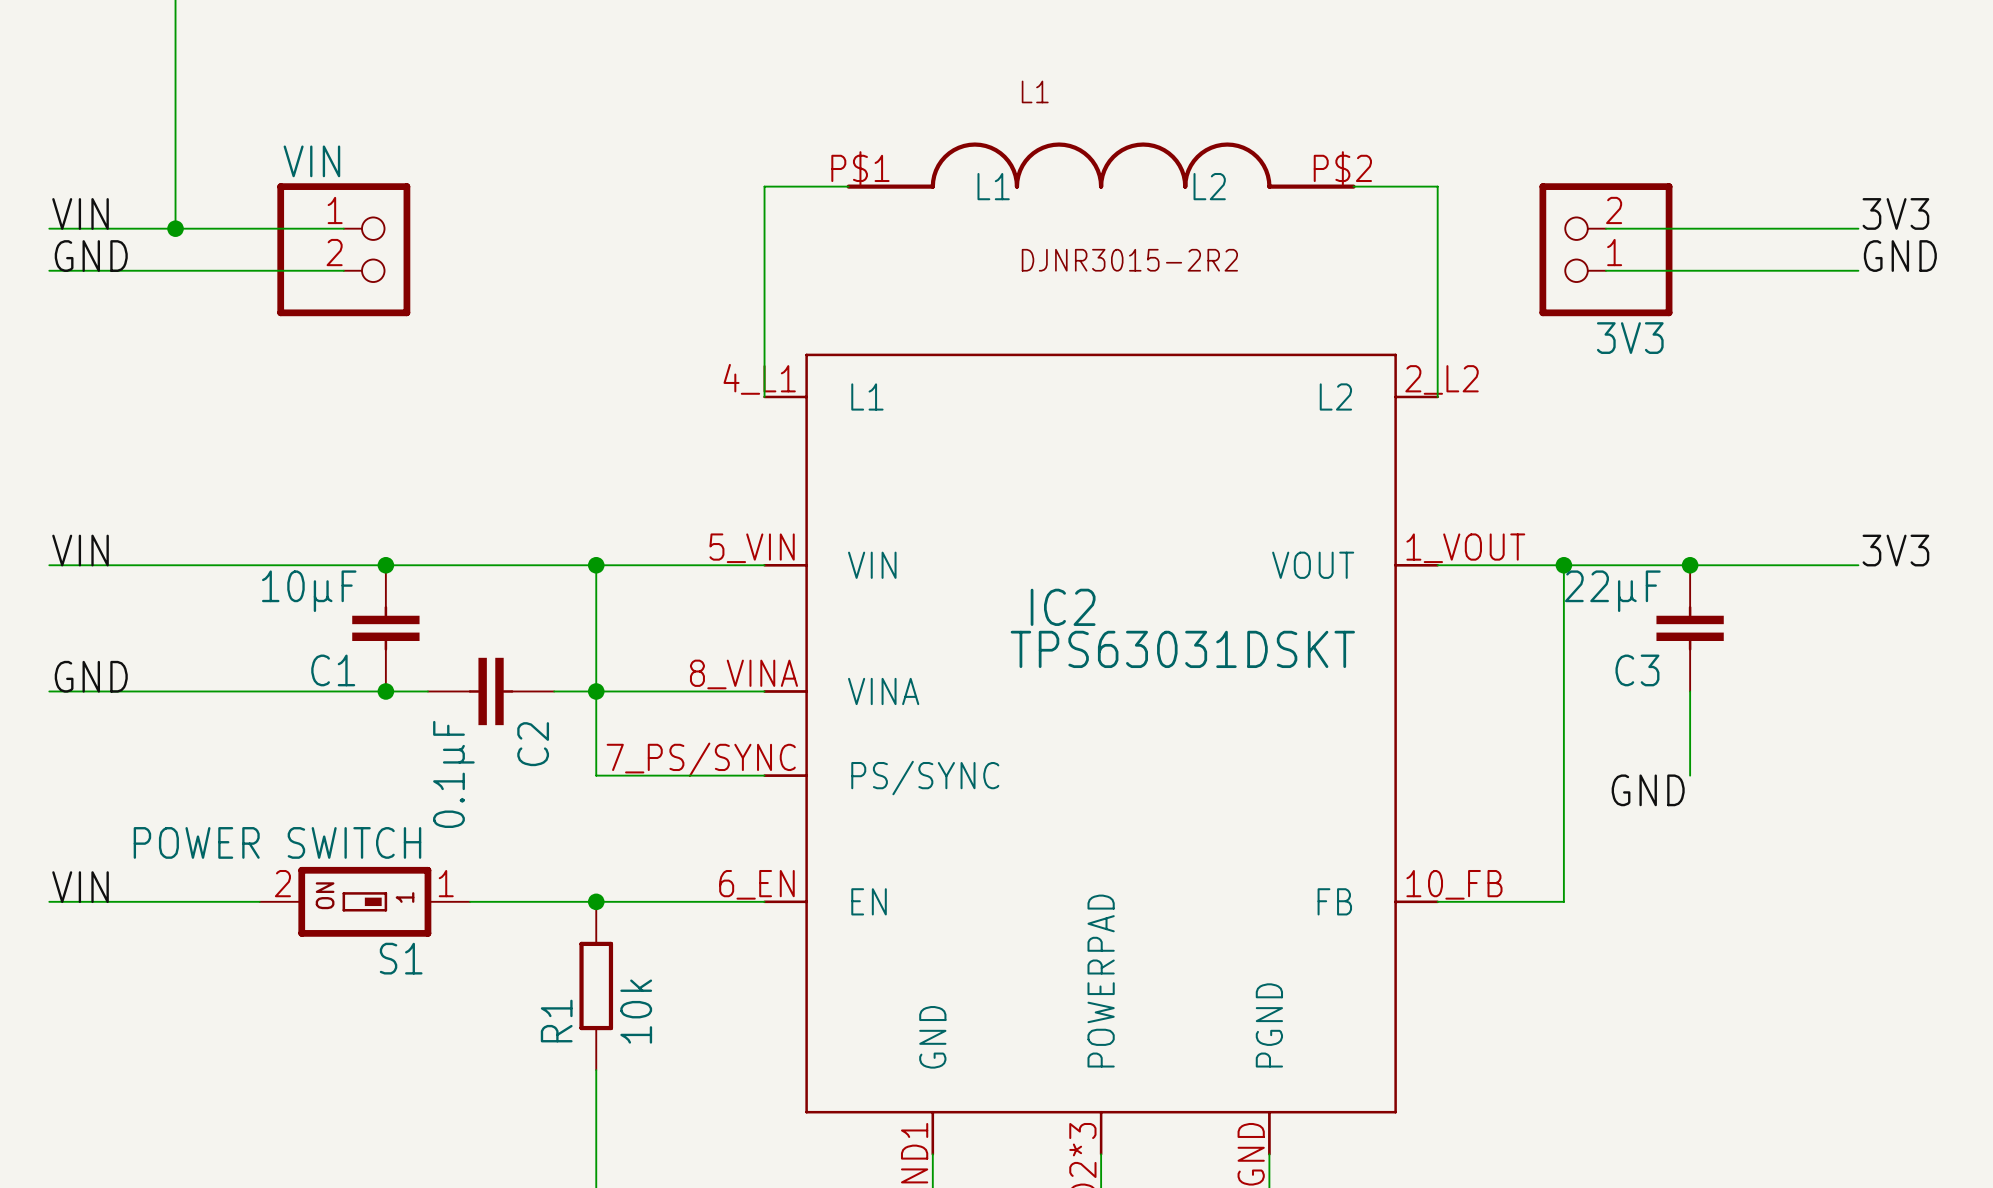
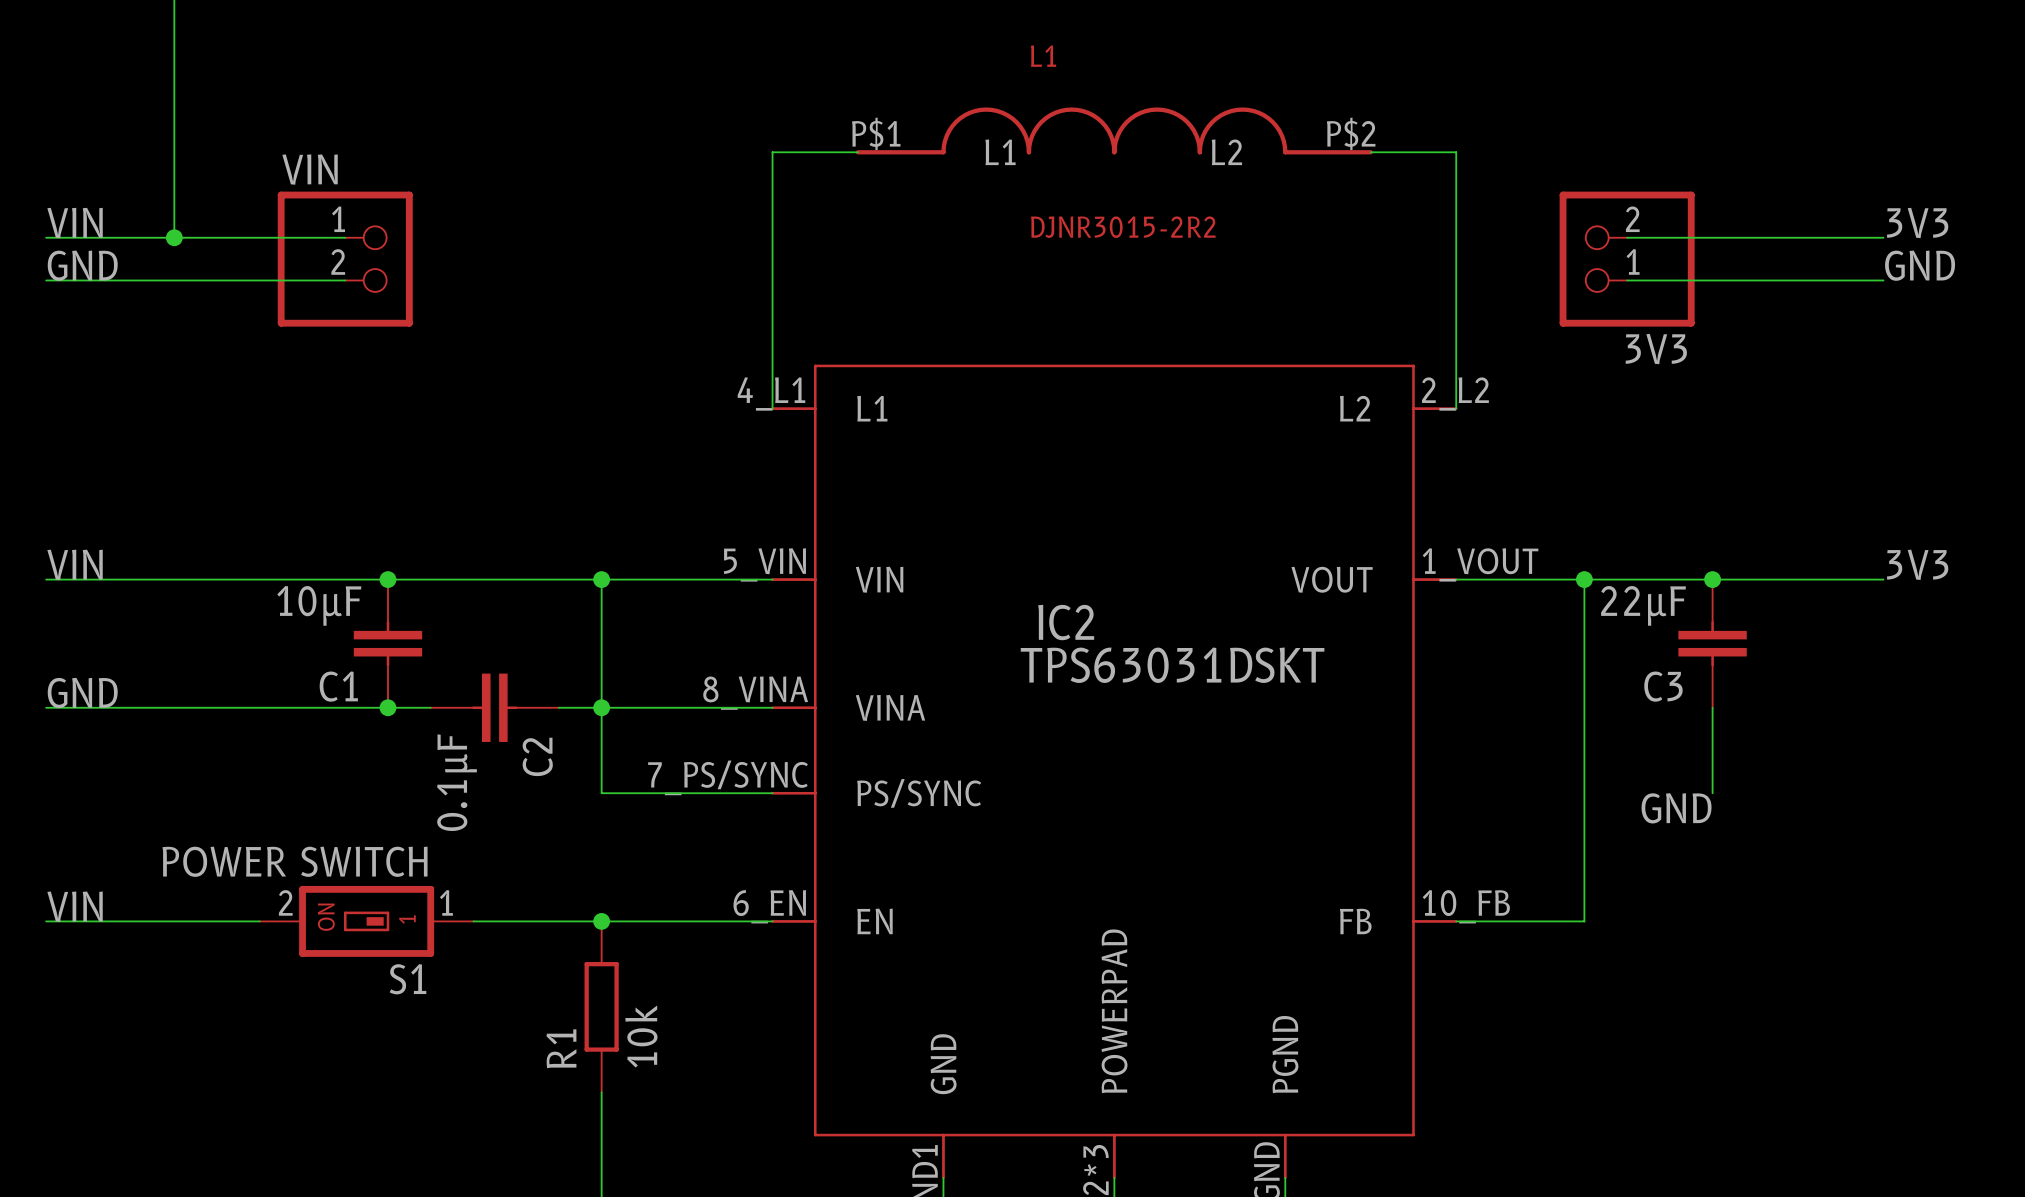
L1 position: (1101, 165) -> (1114, 130)
wire: (764, 186) (848, 186) -> (772, 195) (772, 152) (858, 152)
wire: (1353, 186) (1437, 186) -> (1370, 152) (1456, 152) (1456, 195)

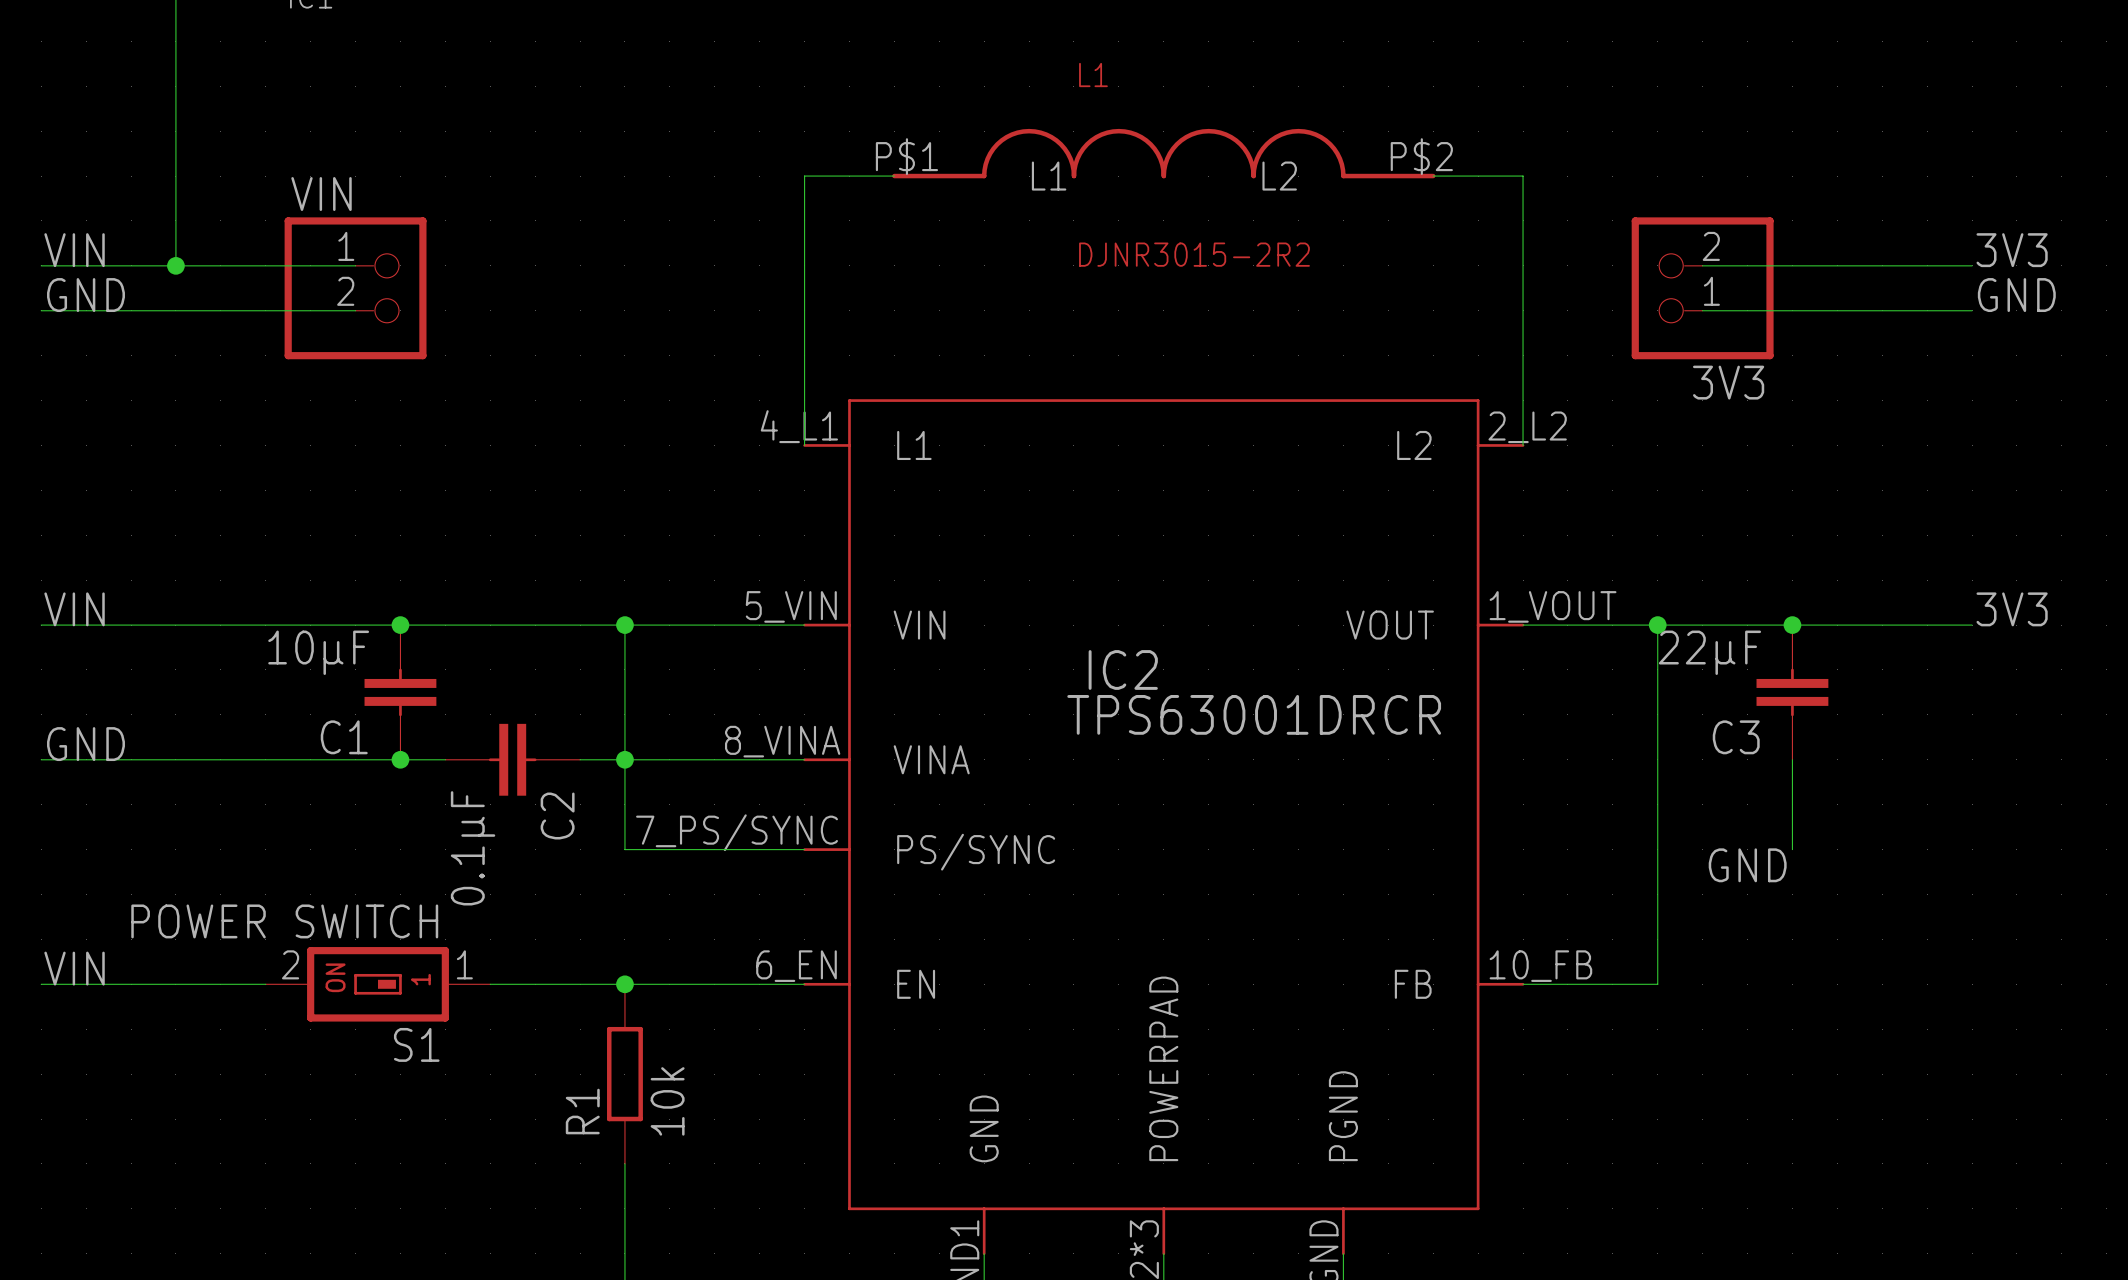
IC2 value: TPS63031DSKT (1172, 665) -> TPS63001DRCR (1254, 714)

